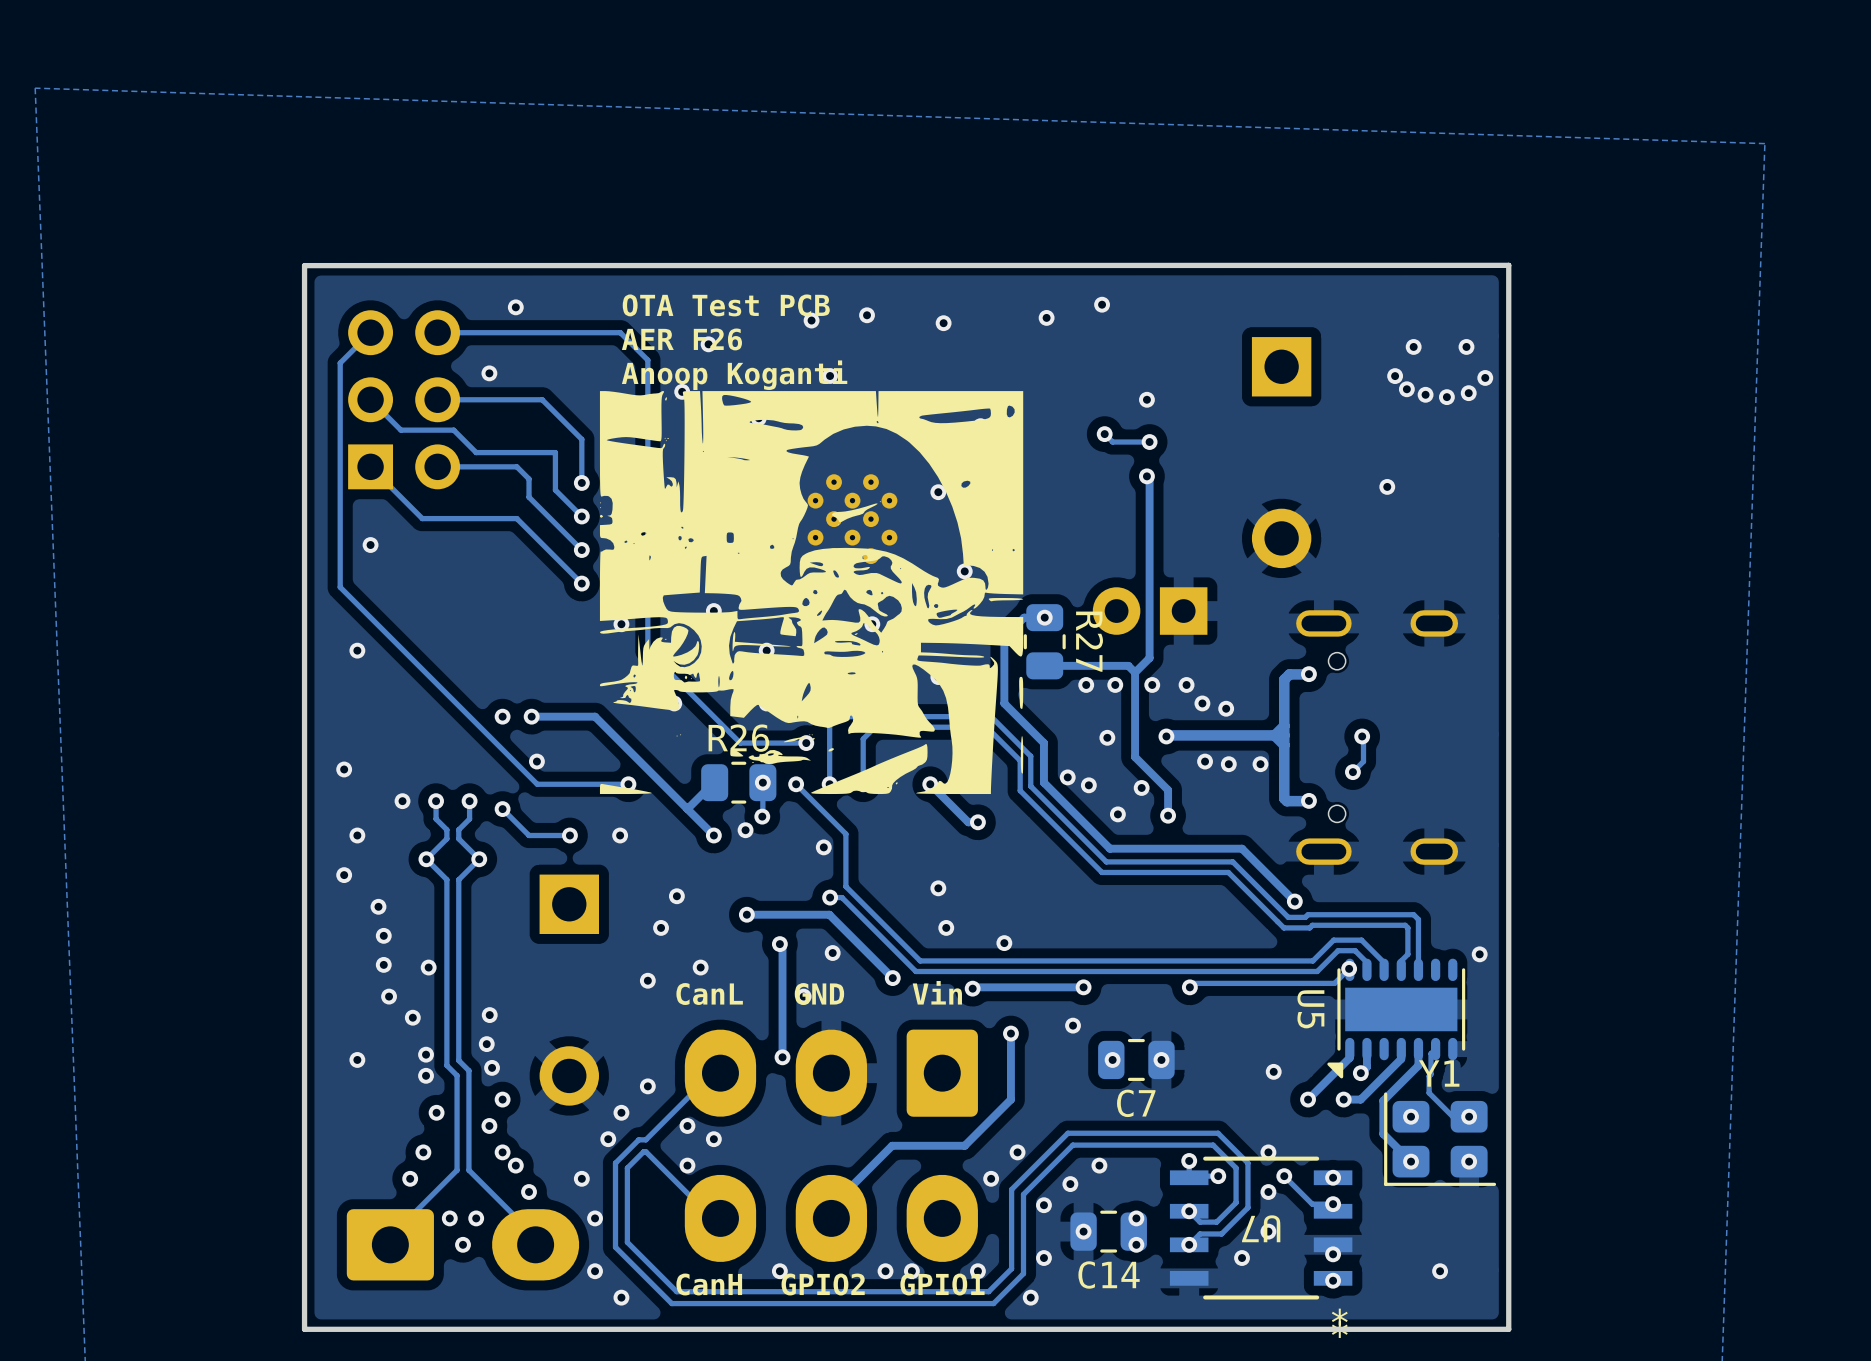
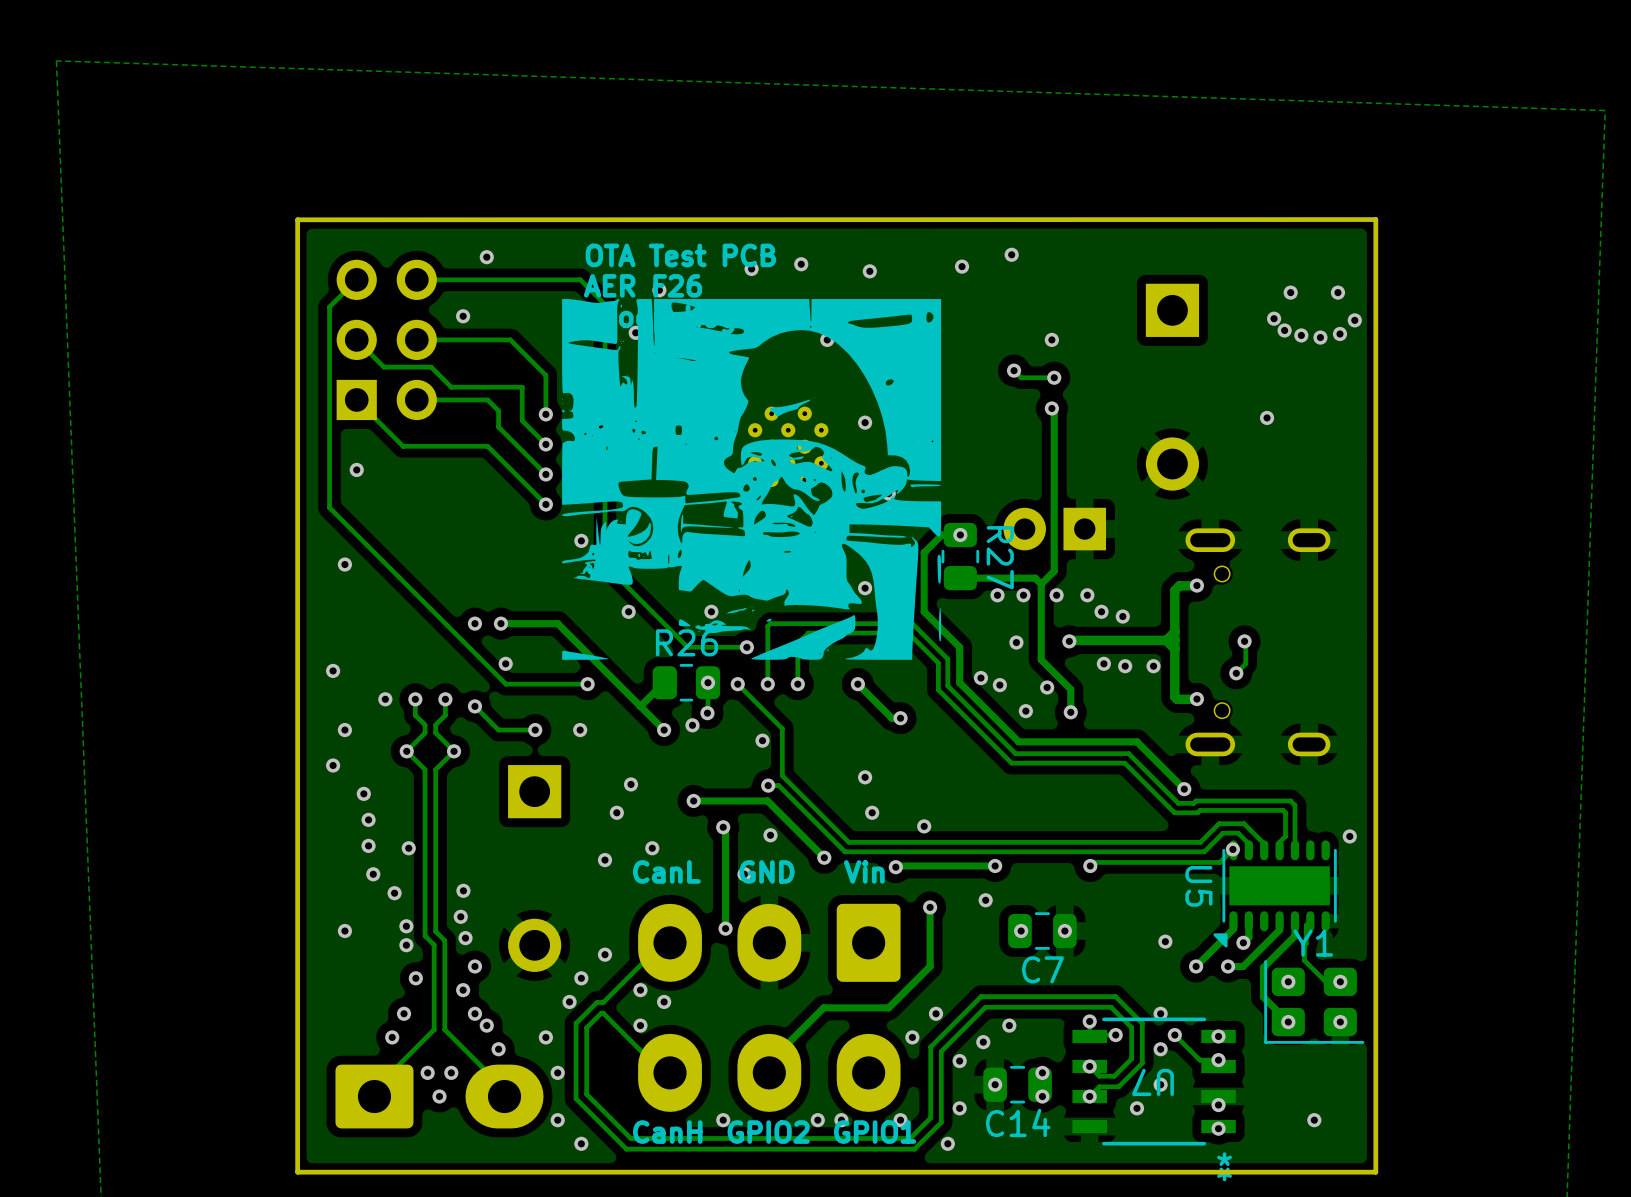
drawing position: (811, 592) -> (751, 479)

